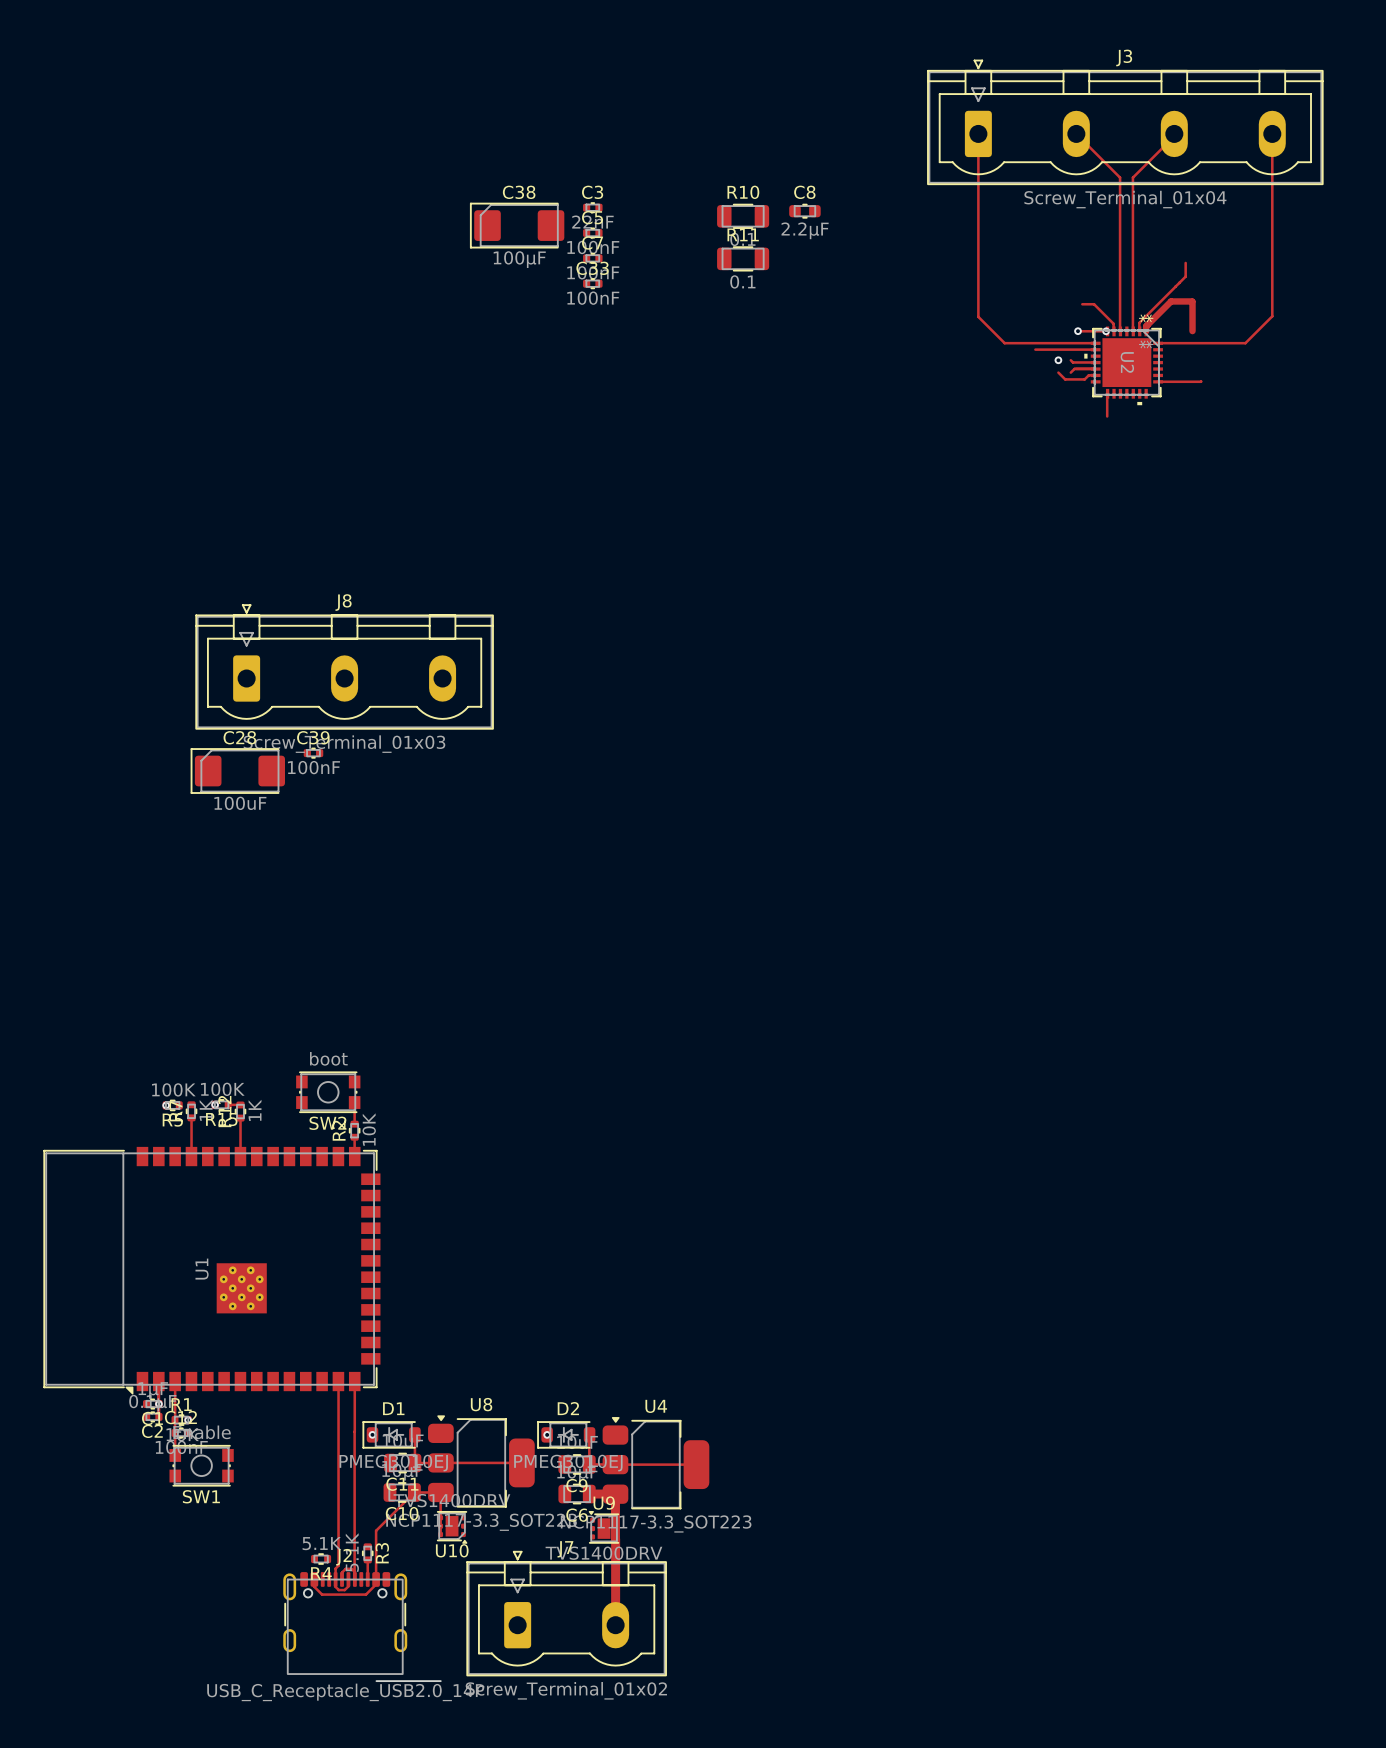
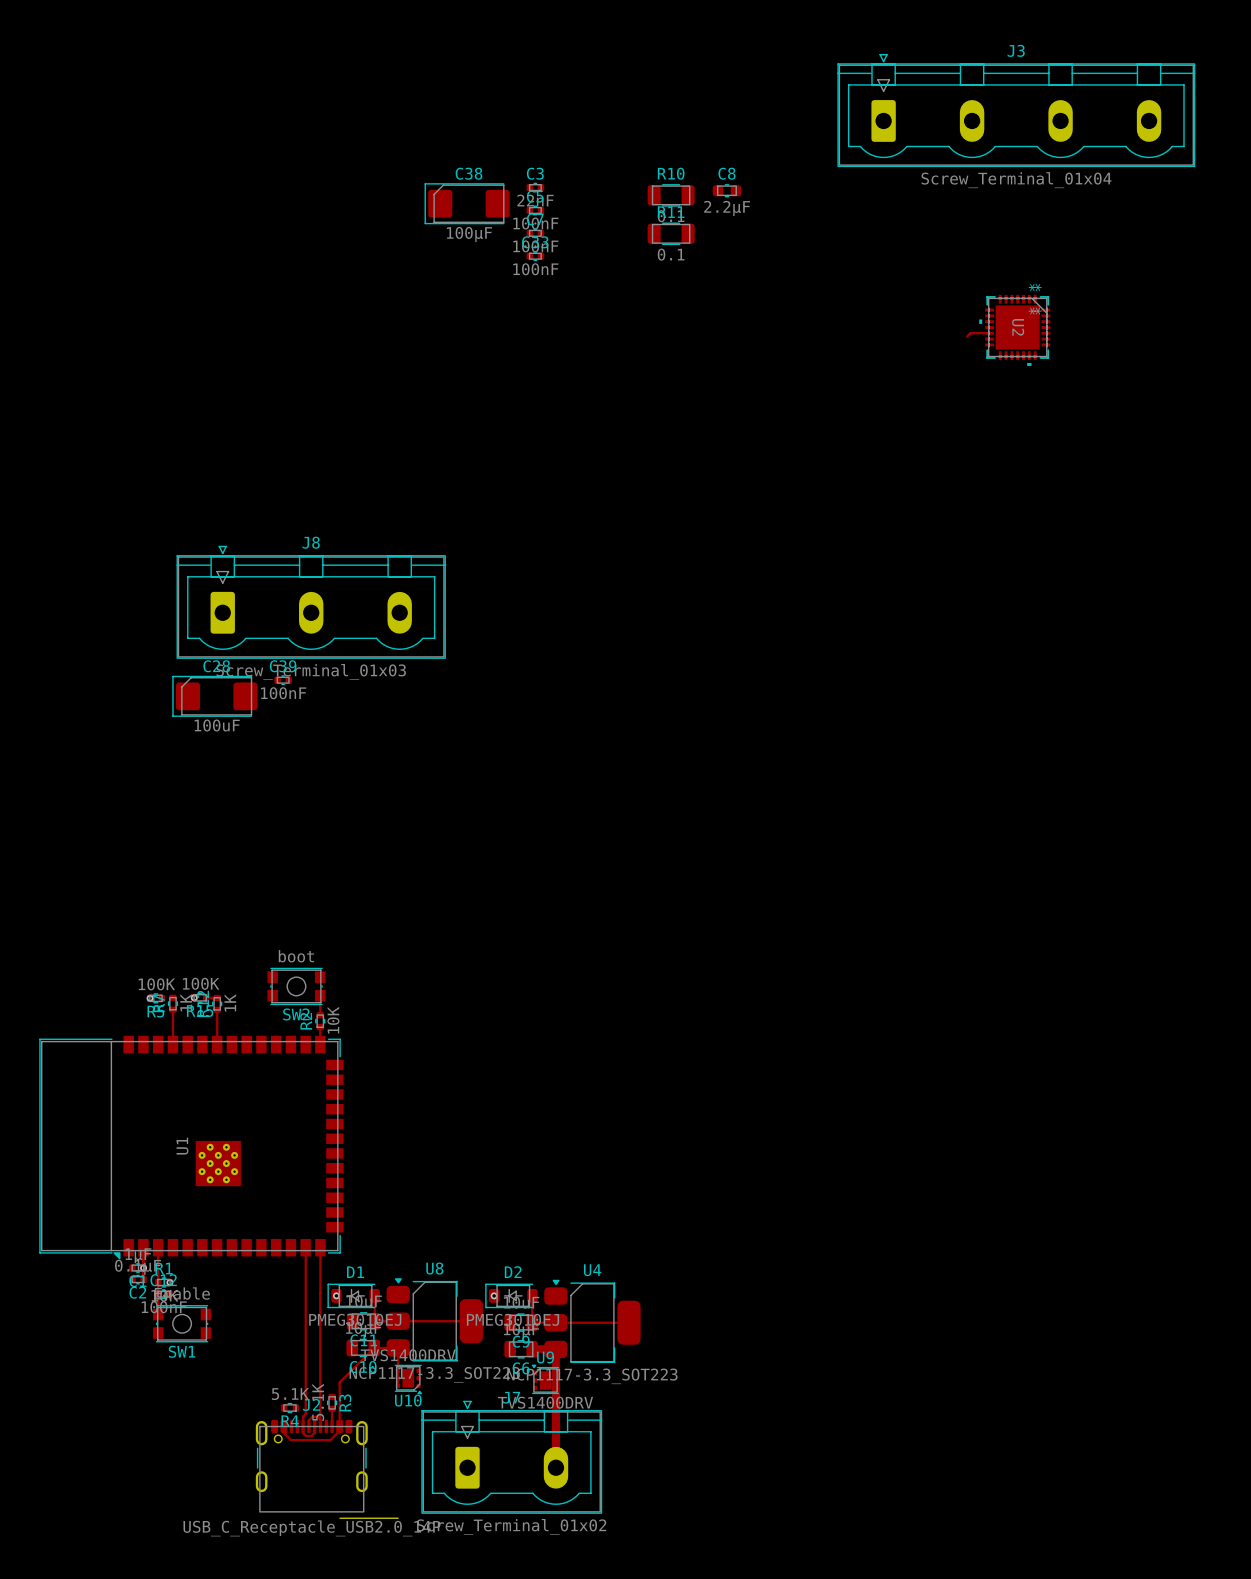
track: (1076, 133) (1120, 177) (1120, 331) -> none
track: (1163, 133) (1174, 133) (1174, 136) (1132, 177) (1132, 331) -> none
track: (1272, 133) (1272, 316) (1245, 343) (1157, 343) -> none
track: (977, 134) (978, 316) (1004, 343) (1095, 343) -> none
track: (1185, 262) (1185, 276) (1175, 286) -> none
track: (1175, 286) (1139, 322) (1139, 331) -> none
track: (1171, 301) (1146, 326) (1146, 331) -> none
track: (1171, 301) (1192, 301) (1192, 331) -> none
track: (1082, 304) (1094, 304) (1113, 323) (1113, 331) -> none
track: (1078, 331) (1107, 331) -> none
via: (1078, 331) -> none
via: (1106, 331) -> none
track: (1035, 349) (1095, 349) -> none
via: (1058, 360) -> none
track: (1070, 360) (1073, 362) (1095, 362) -> none
track: (1058, 372) (1065, 379) (1084, 379) (1088, 375) (1095, 375) -> none
track: (1201, 381) (1157, 381) -> none
track: (1107, 393) (1107, 416) -> none

